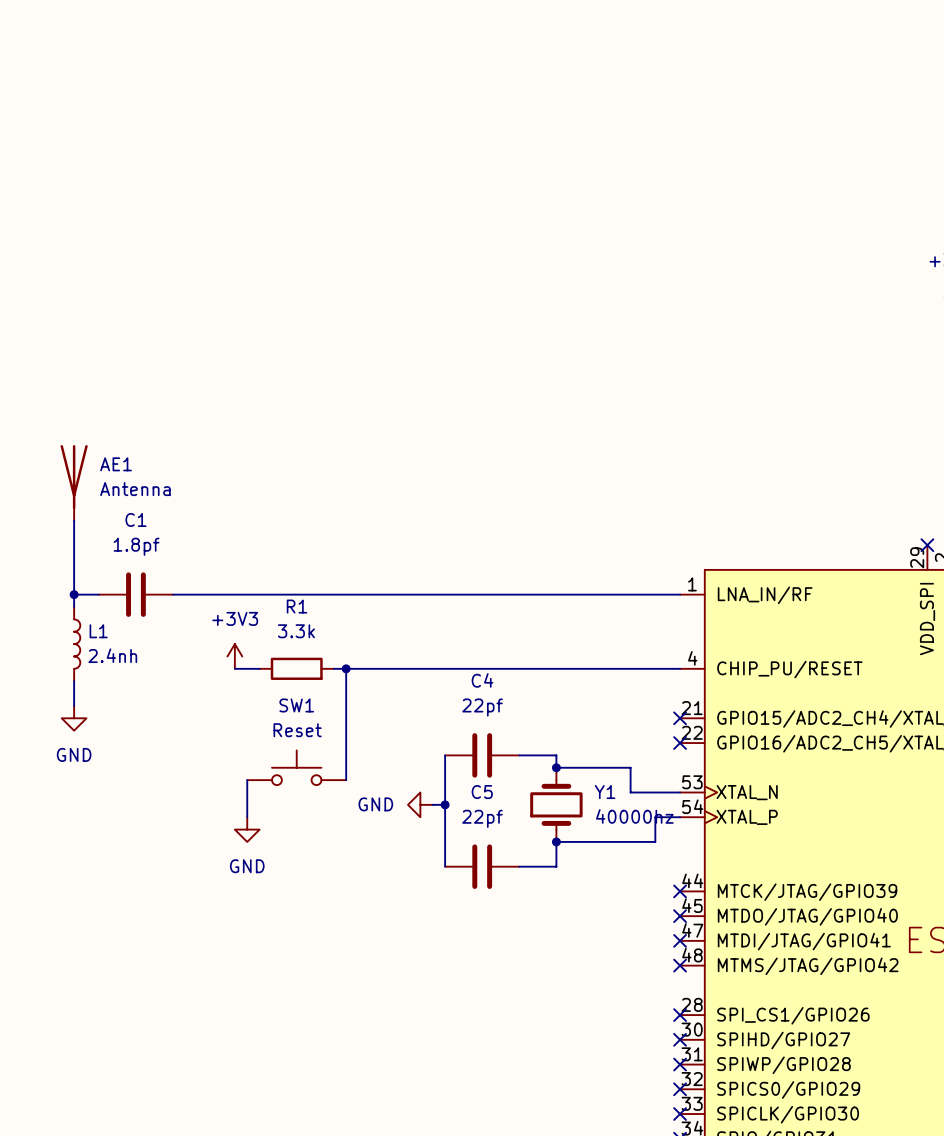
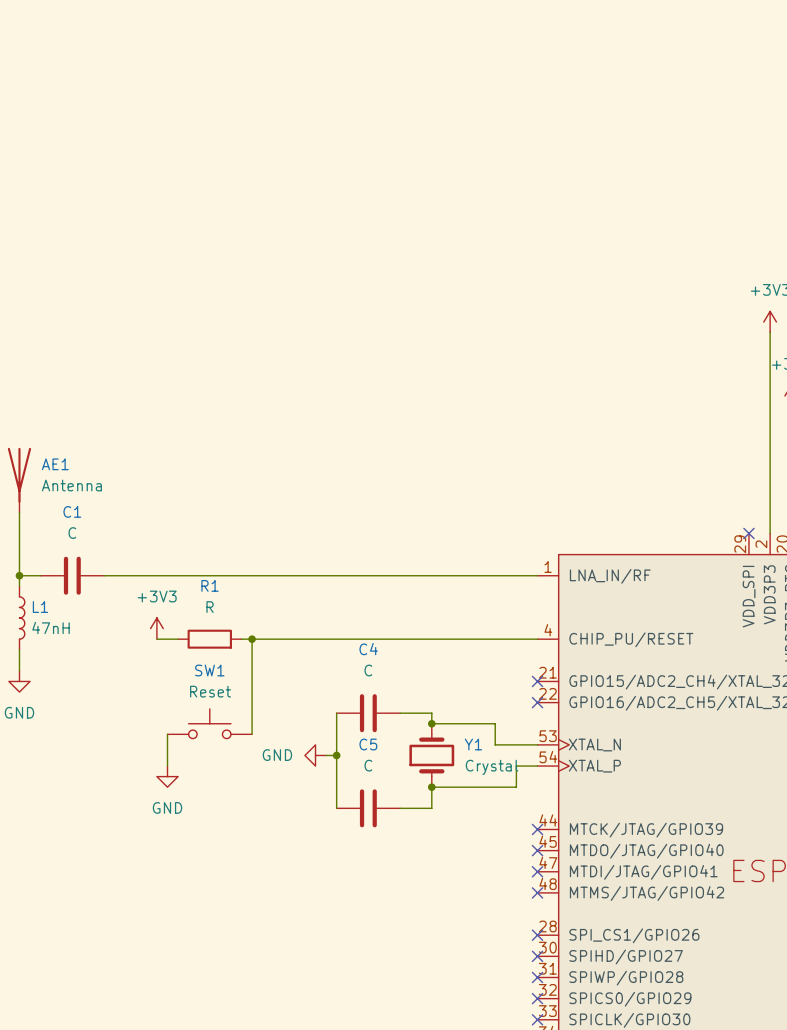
C1 value: 1.8pf (136, 546) -> C (72, 533)
R1 value: 3.3k (296, 631) -> R (210, 607)
L1 value: 2.4nh (112, 655) -> 47nH (51, 627)
C4 value: 22pf (482, 707) -> C (368, 670)
Y1 value: 40000hz (634, 816) -> Crystal (492, 767)
C5 value: 22pf (482, 818) -> C (368, 765)

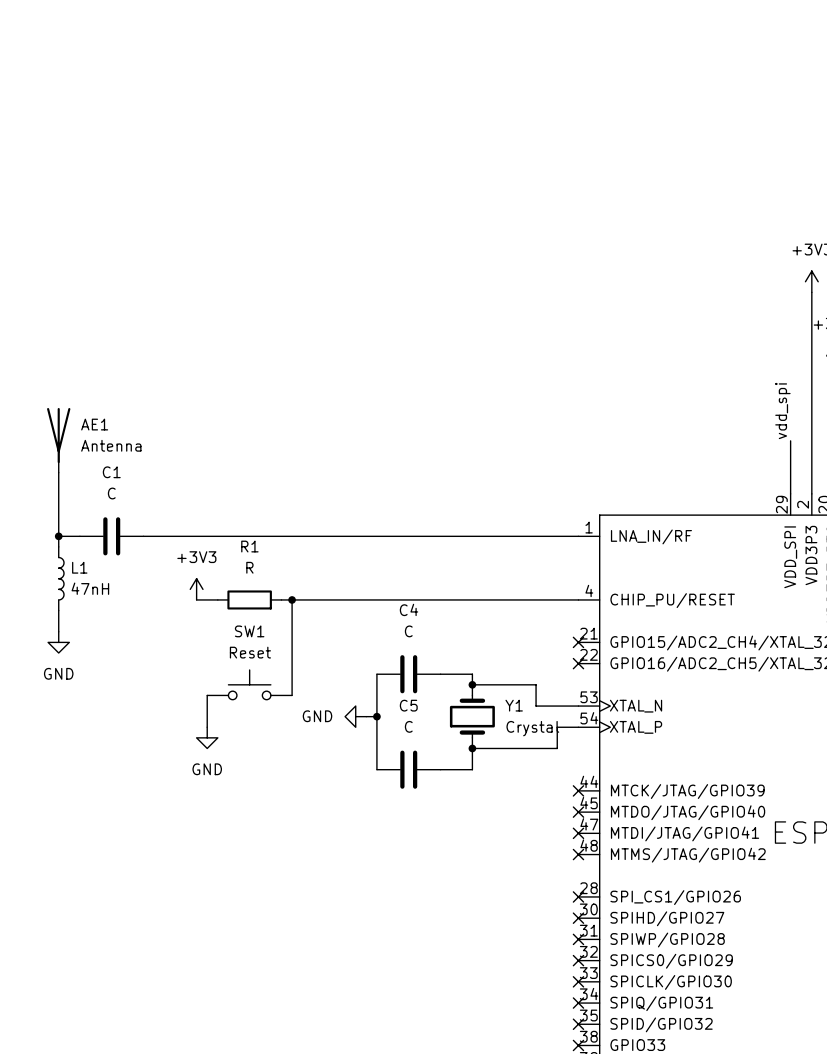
label: none -> vdd_spi (782, 410)
wire: none -> (790, 440) (790, 493)
no-connect mark: (748, 533) -> none

